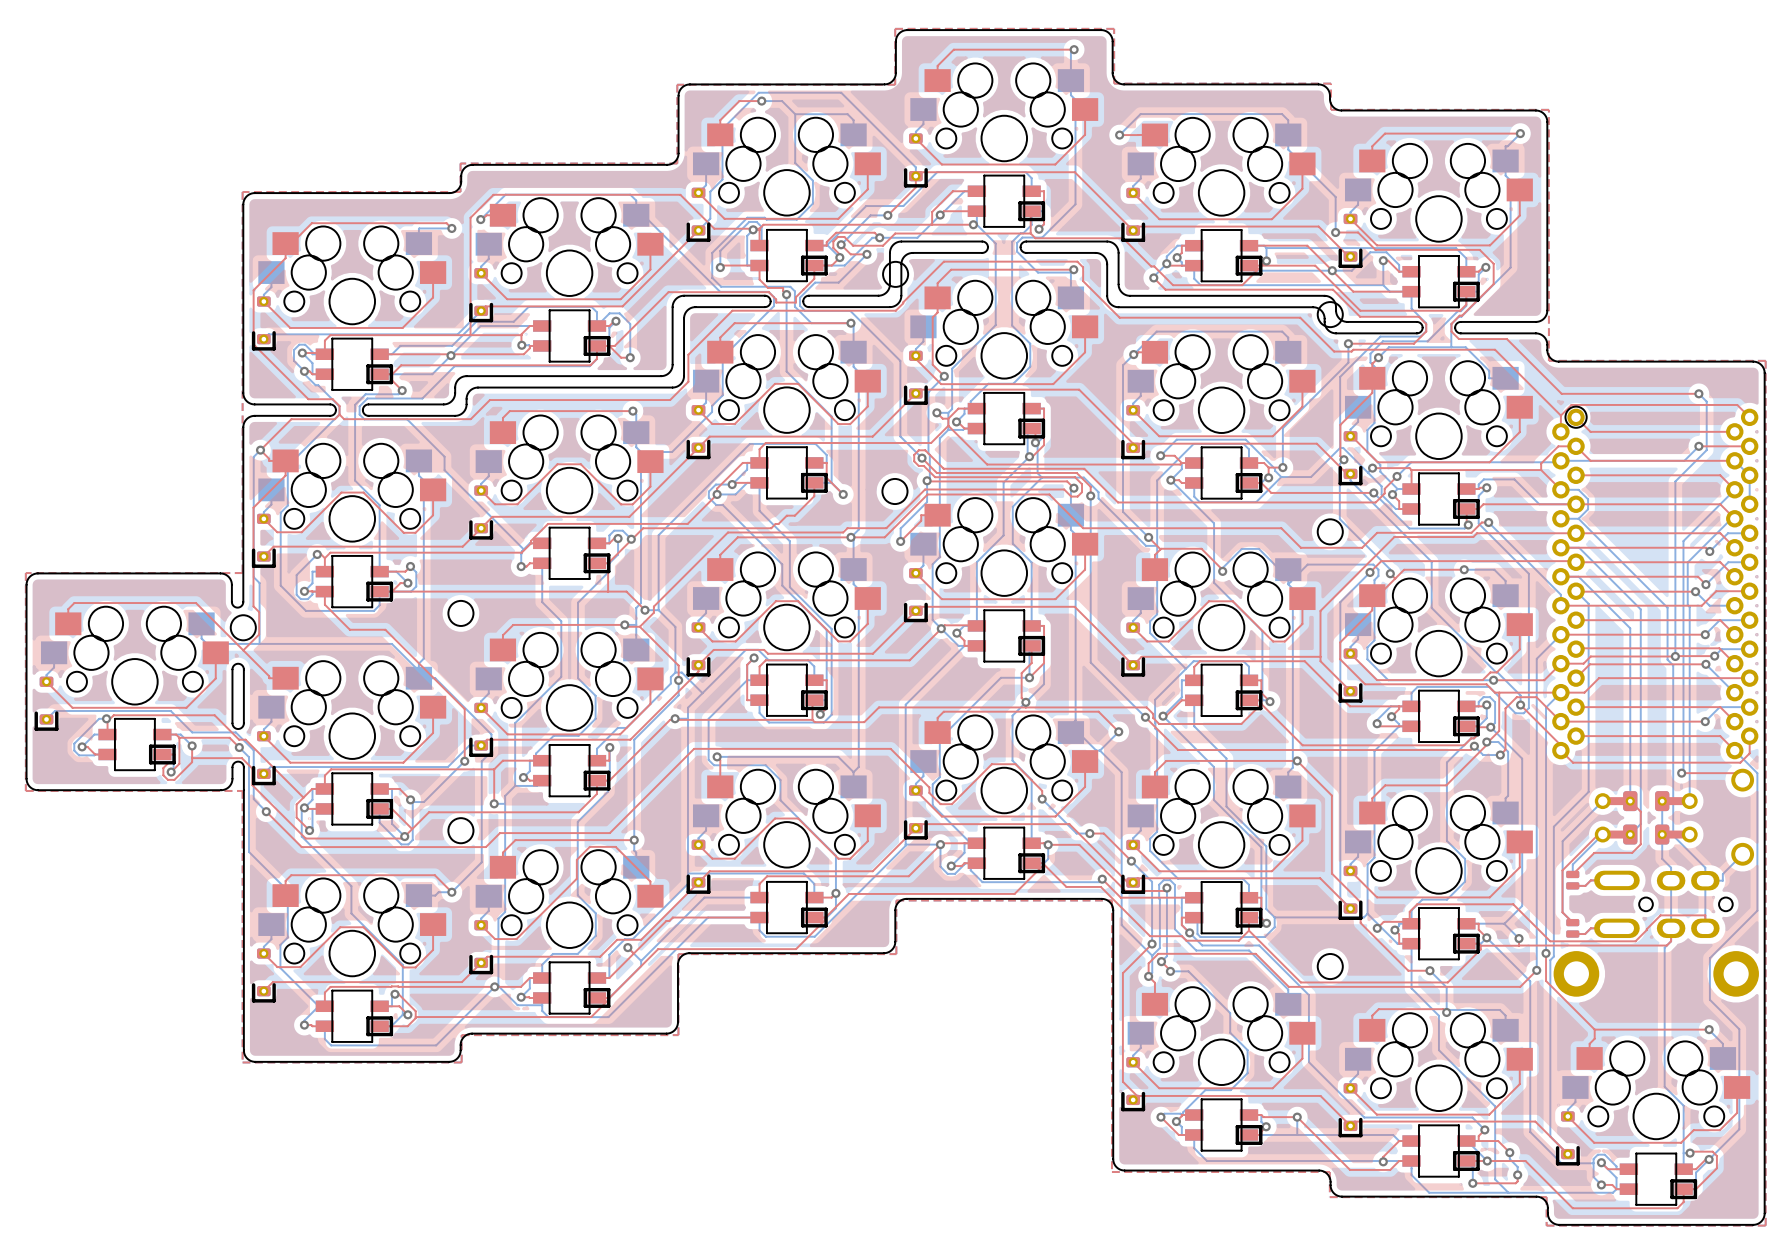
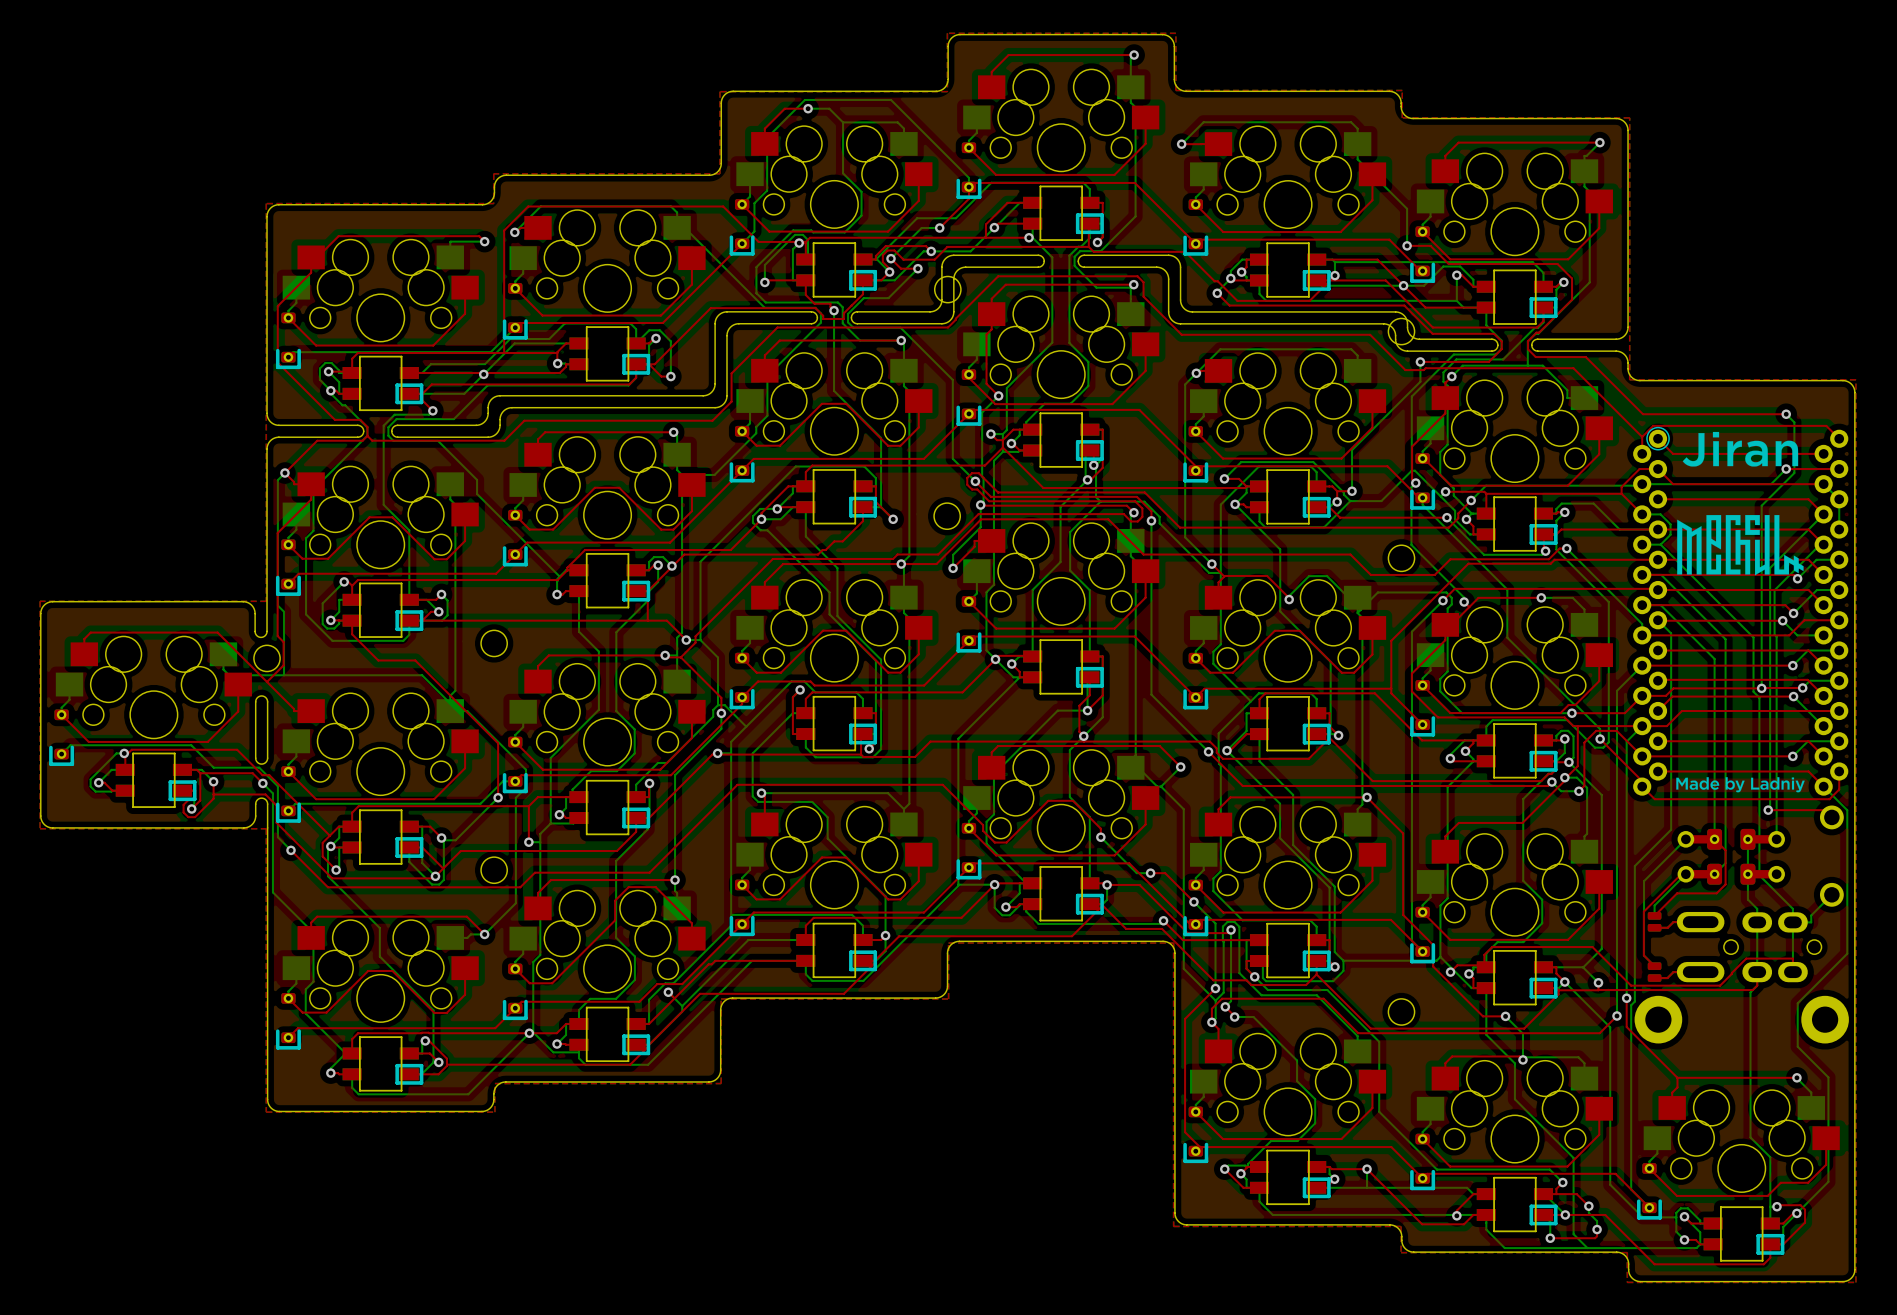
drawing: none -> [1676, 431, 1805, 793]

